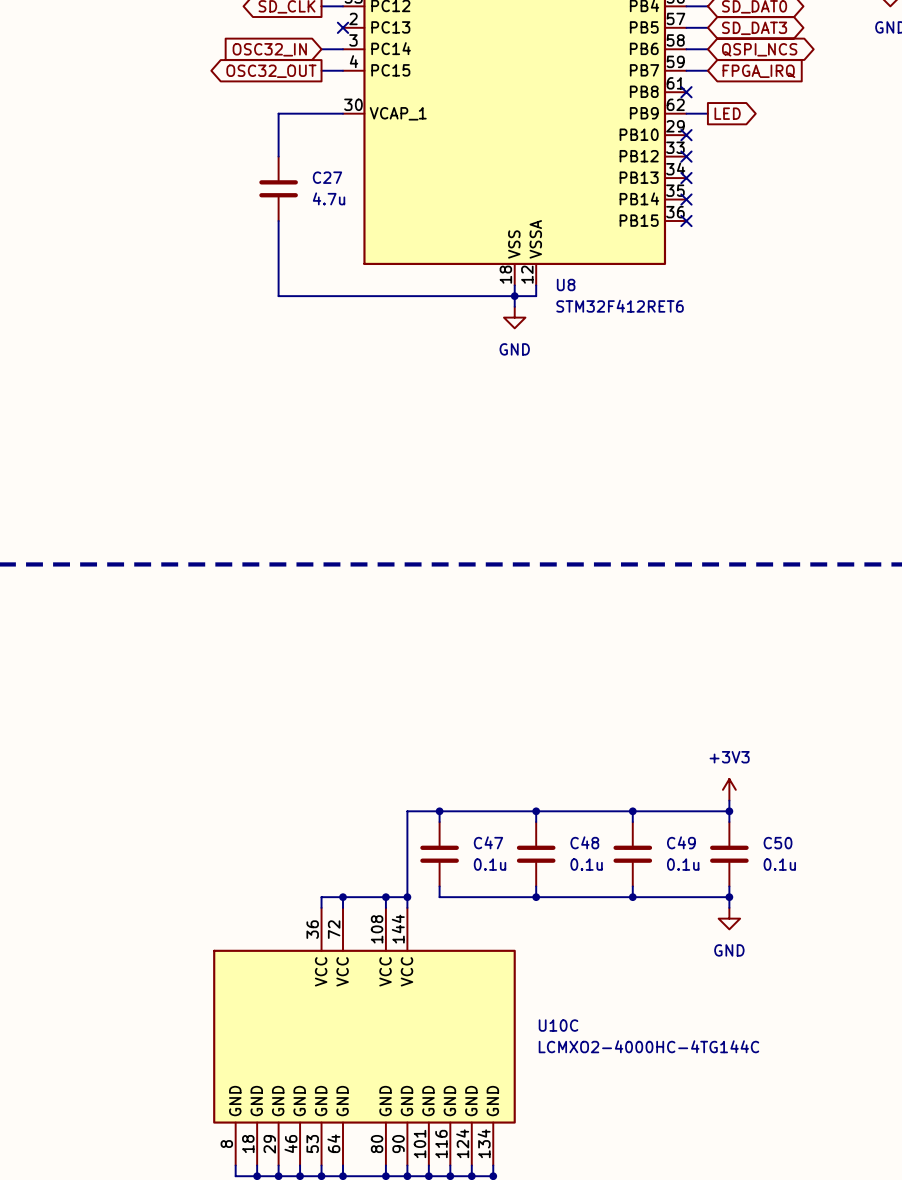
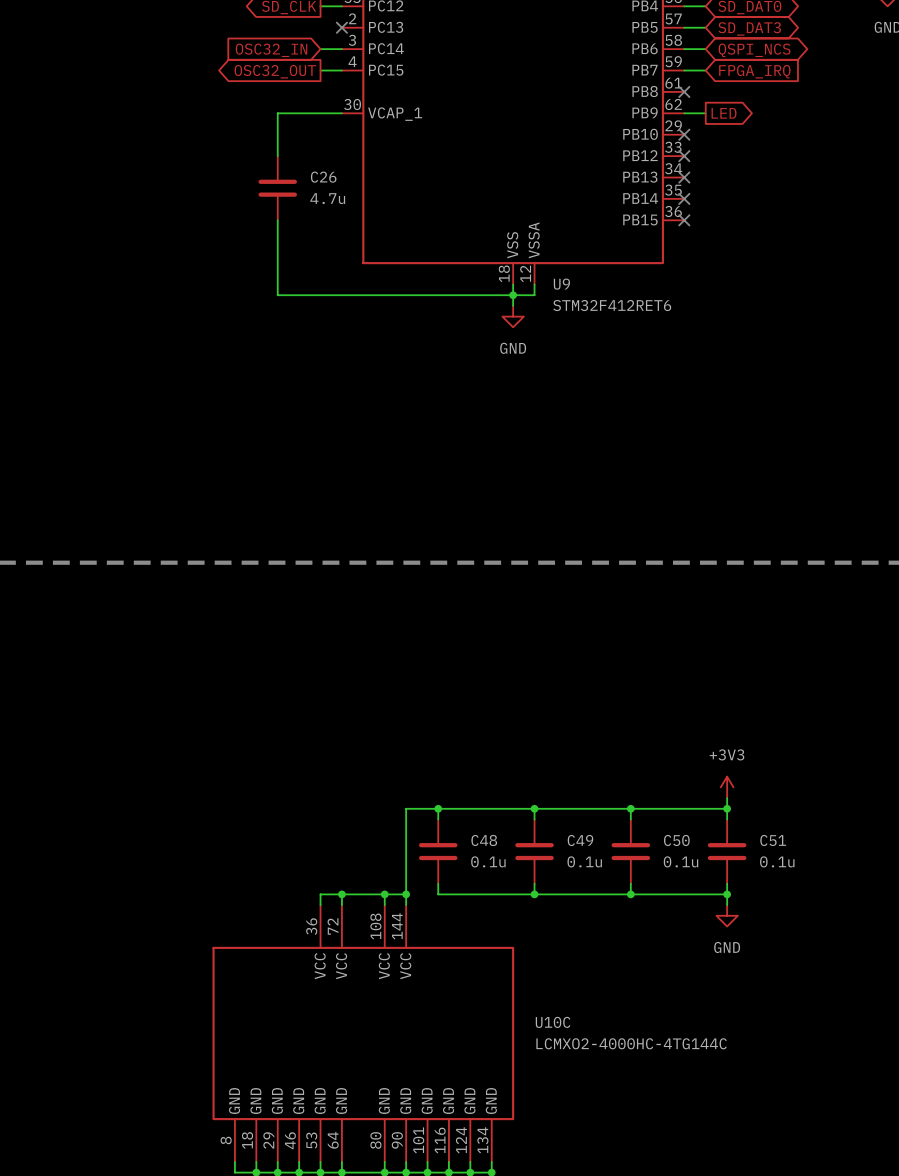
C27 name: C27 (327, 177) -> C26 (323, 177)
U8 name: U8 (566, 285) -> U9 (561, 284)
C47 name: C47 (488, 842) -> C48 (484, 840)
C48 name: C48 (584, 842) -> C49 (580, 840)
C49 name: C49 (681, 842) -> C50 (676, 840)
C50 name: C50 (778, 843) -> C51 (773, 840)

